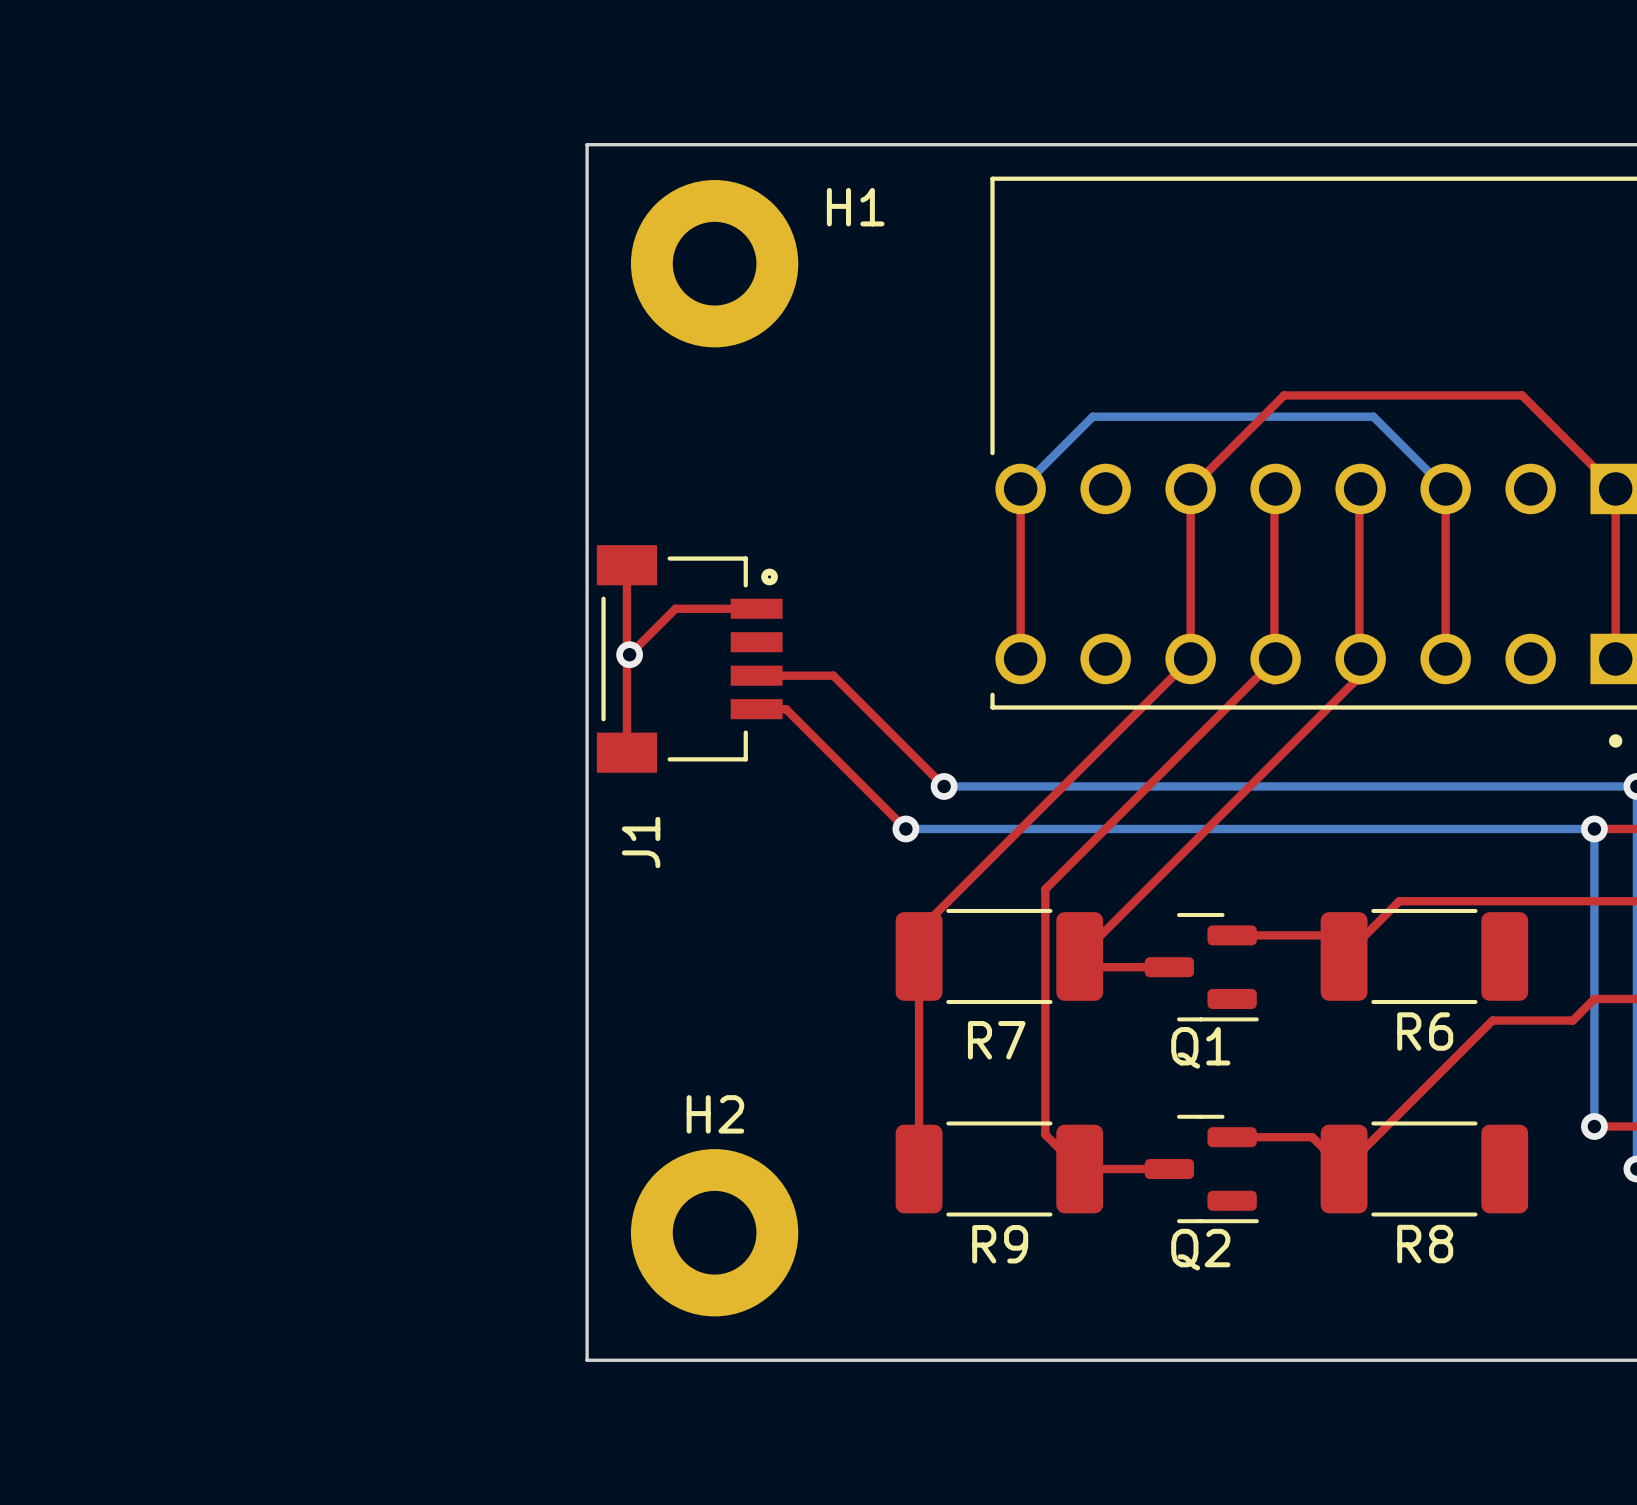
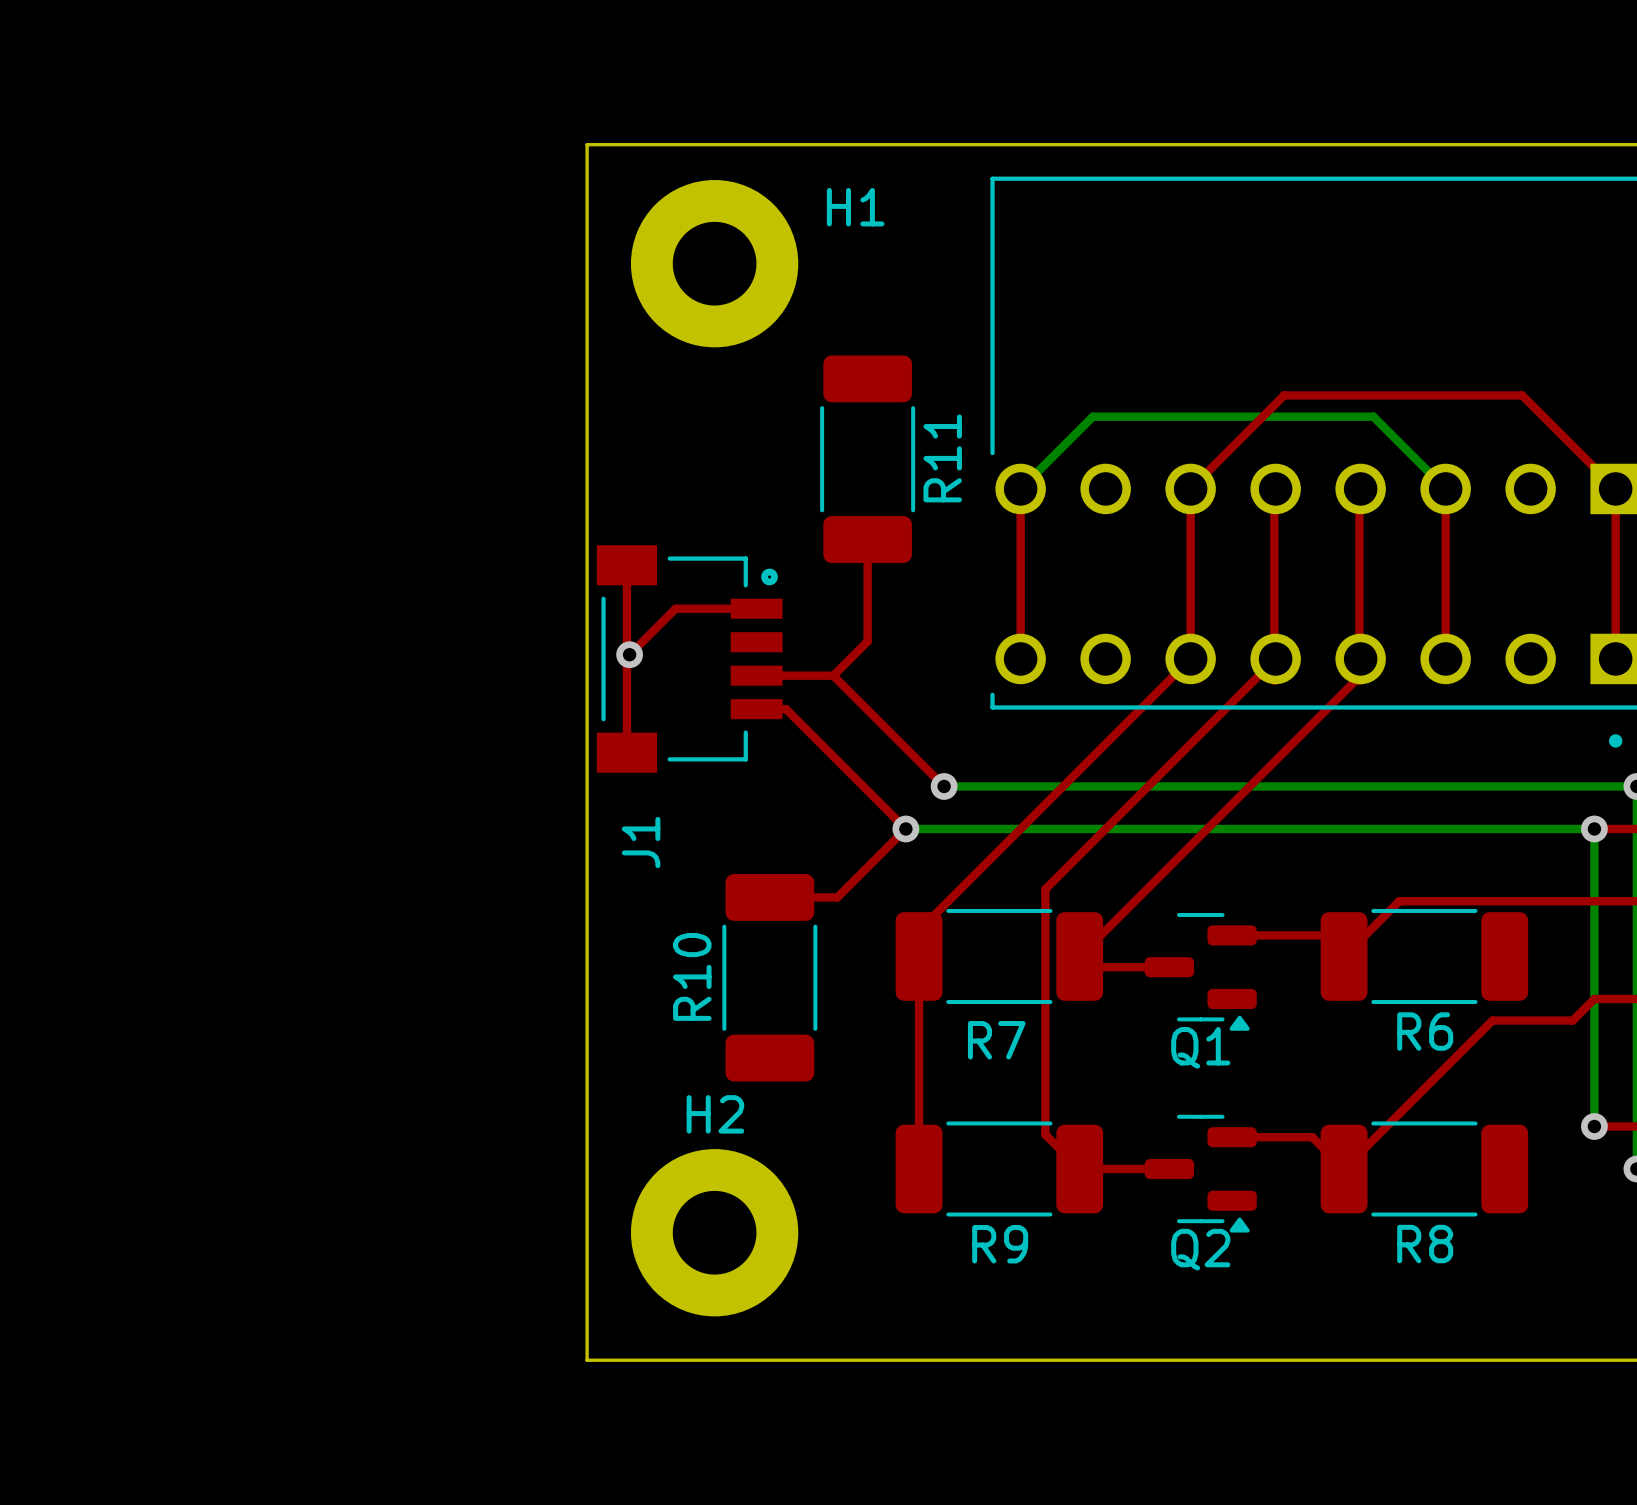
R11: none -> (867, 459)
top track: none -> (867, 539) (867, 641) (833, 675)
top track: none -> (905, 828) (837, 897) (769, 897)
Q1 footprint: [1144, 912, 1259, 1022] -> [1144, 912, 1257, 1031]
R10: none -> (769, 977)
Q2 footprint: [1144, 1114, 1259, 1224] -> [1144, 1114, 1257, 1233]

